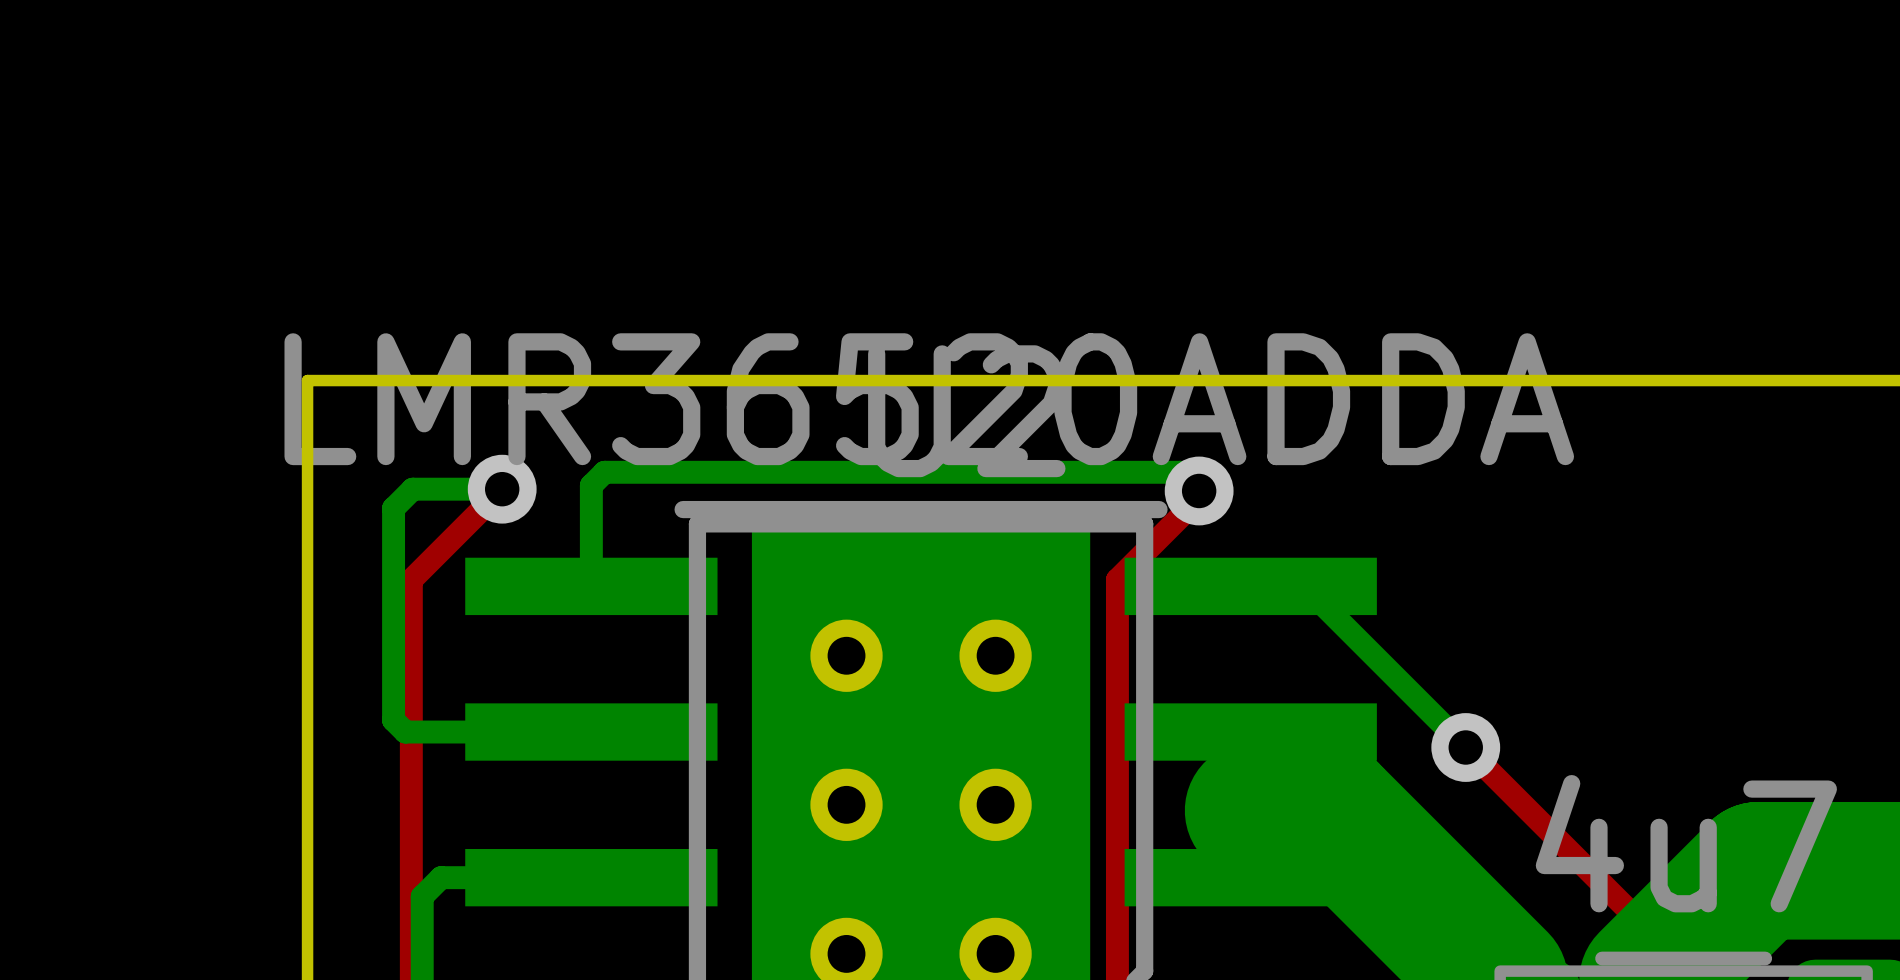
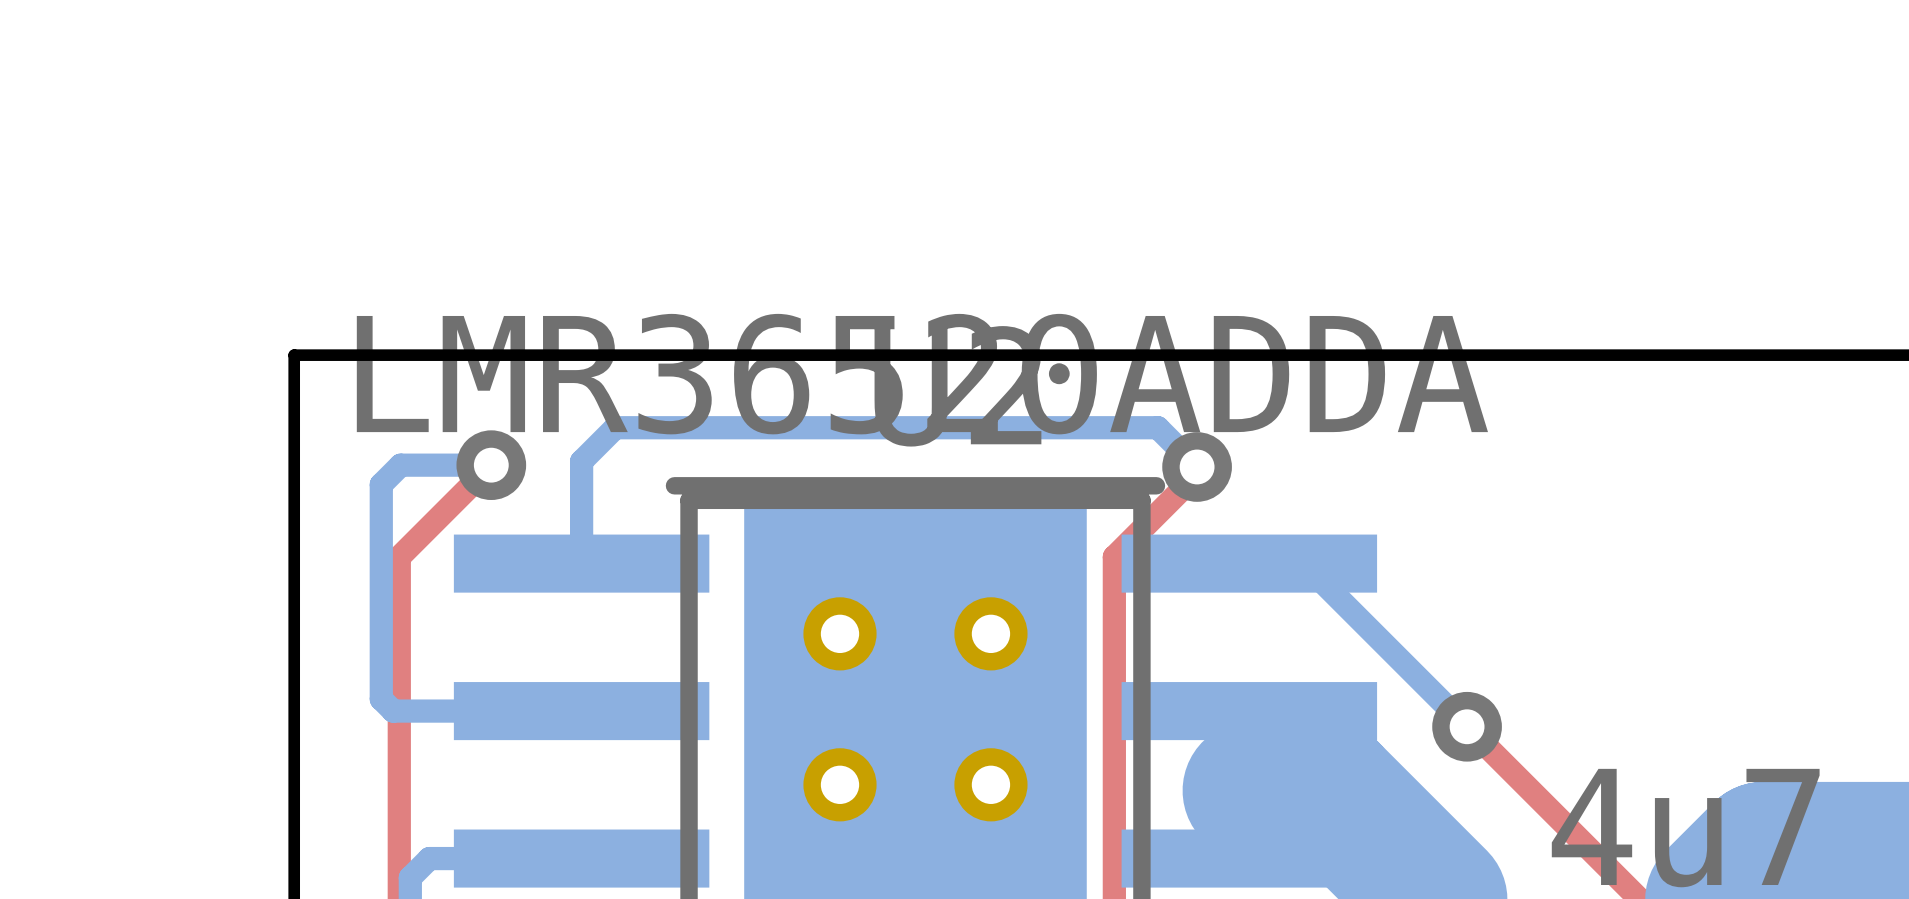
bottom track: (1180, 472) (604, 472) -> (1178, 448) (1157, 427) (615, 427) (594, 448)

